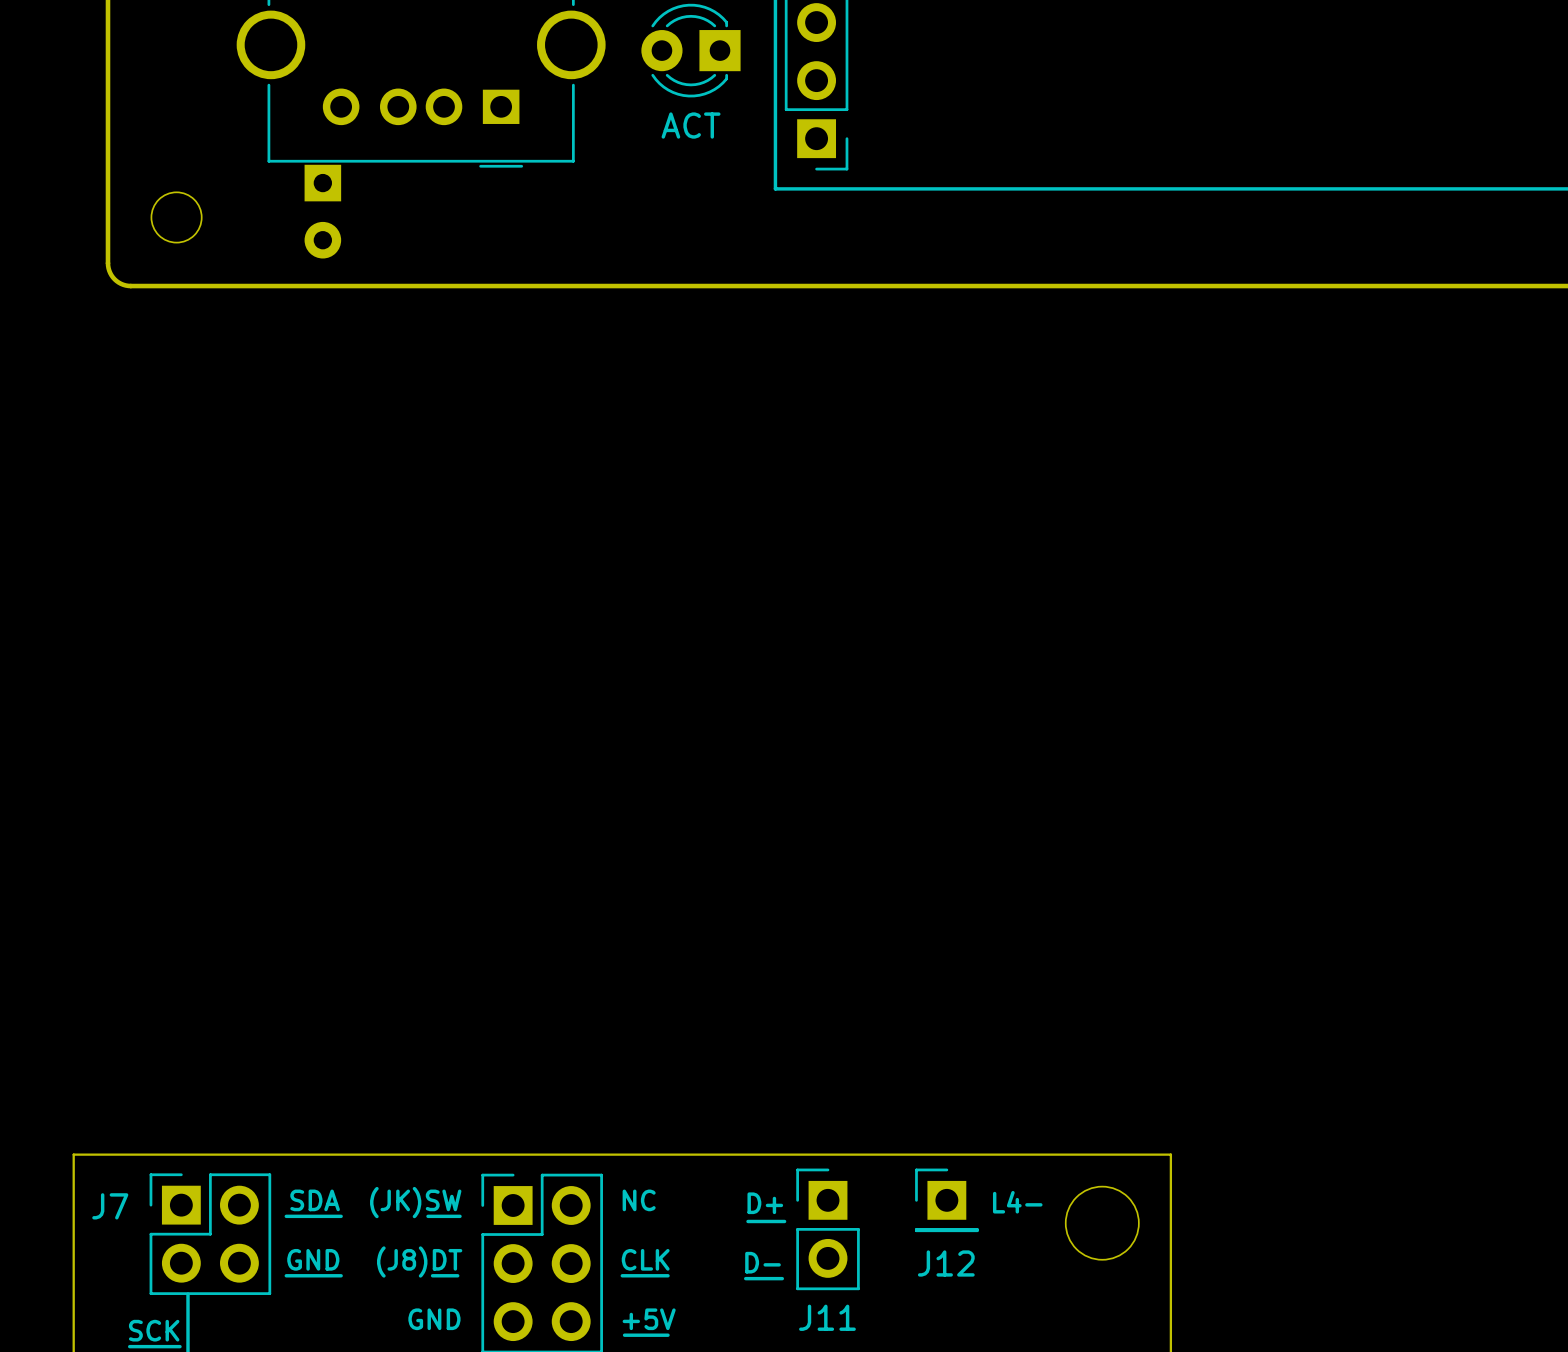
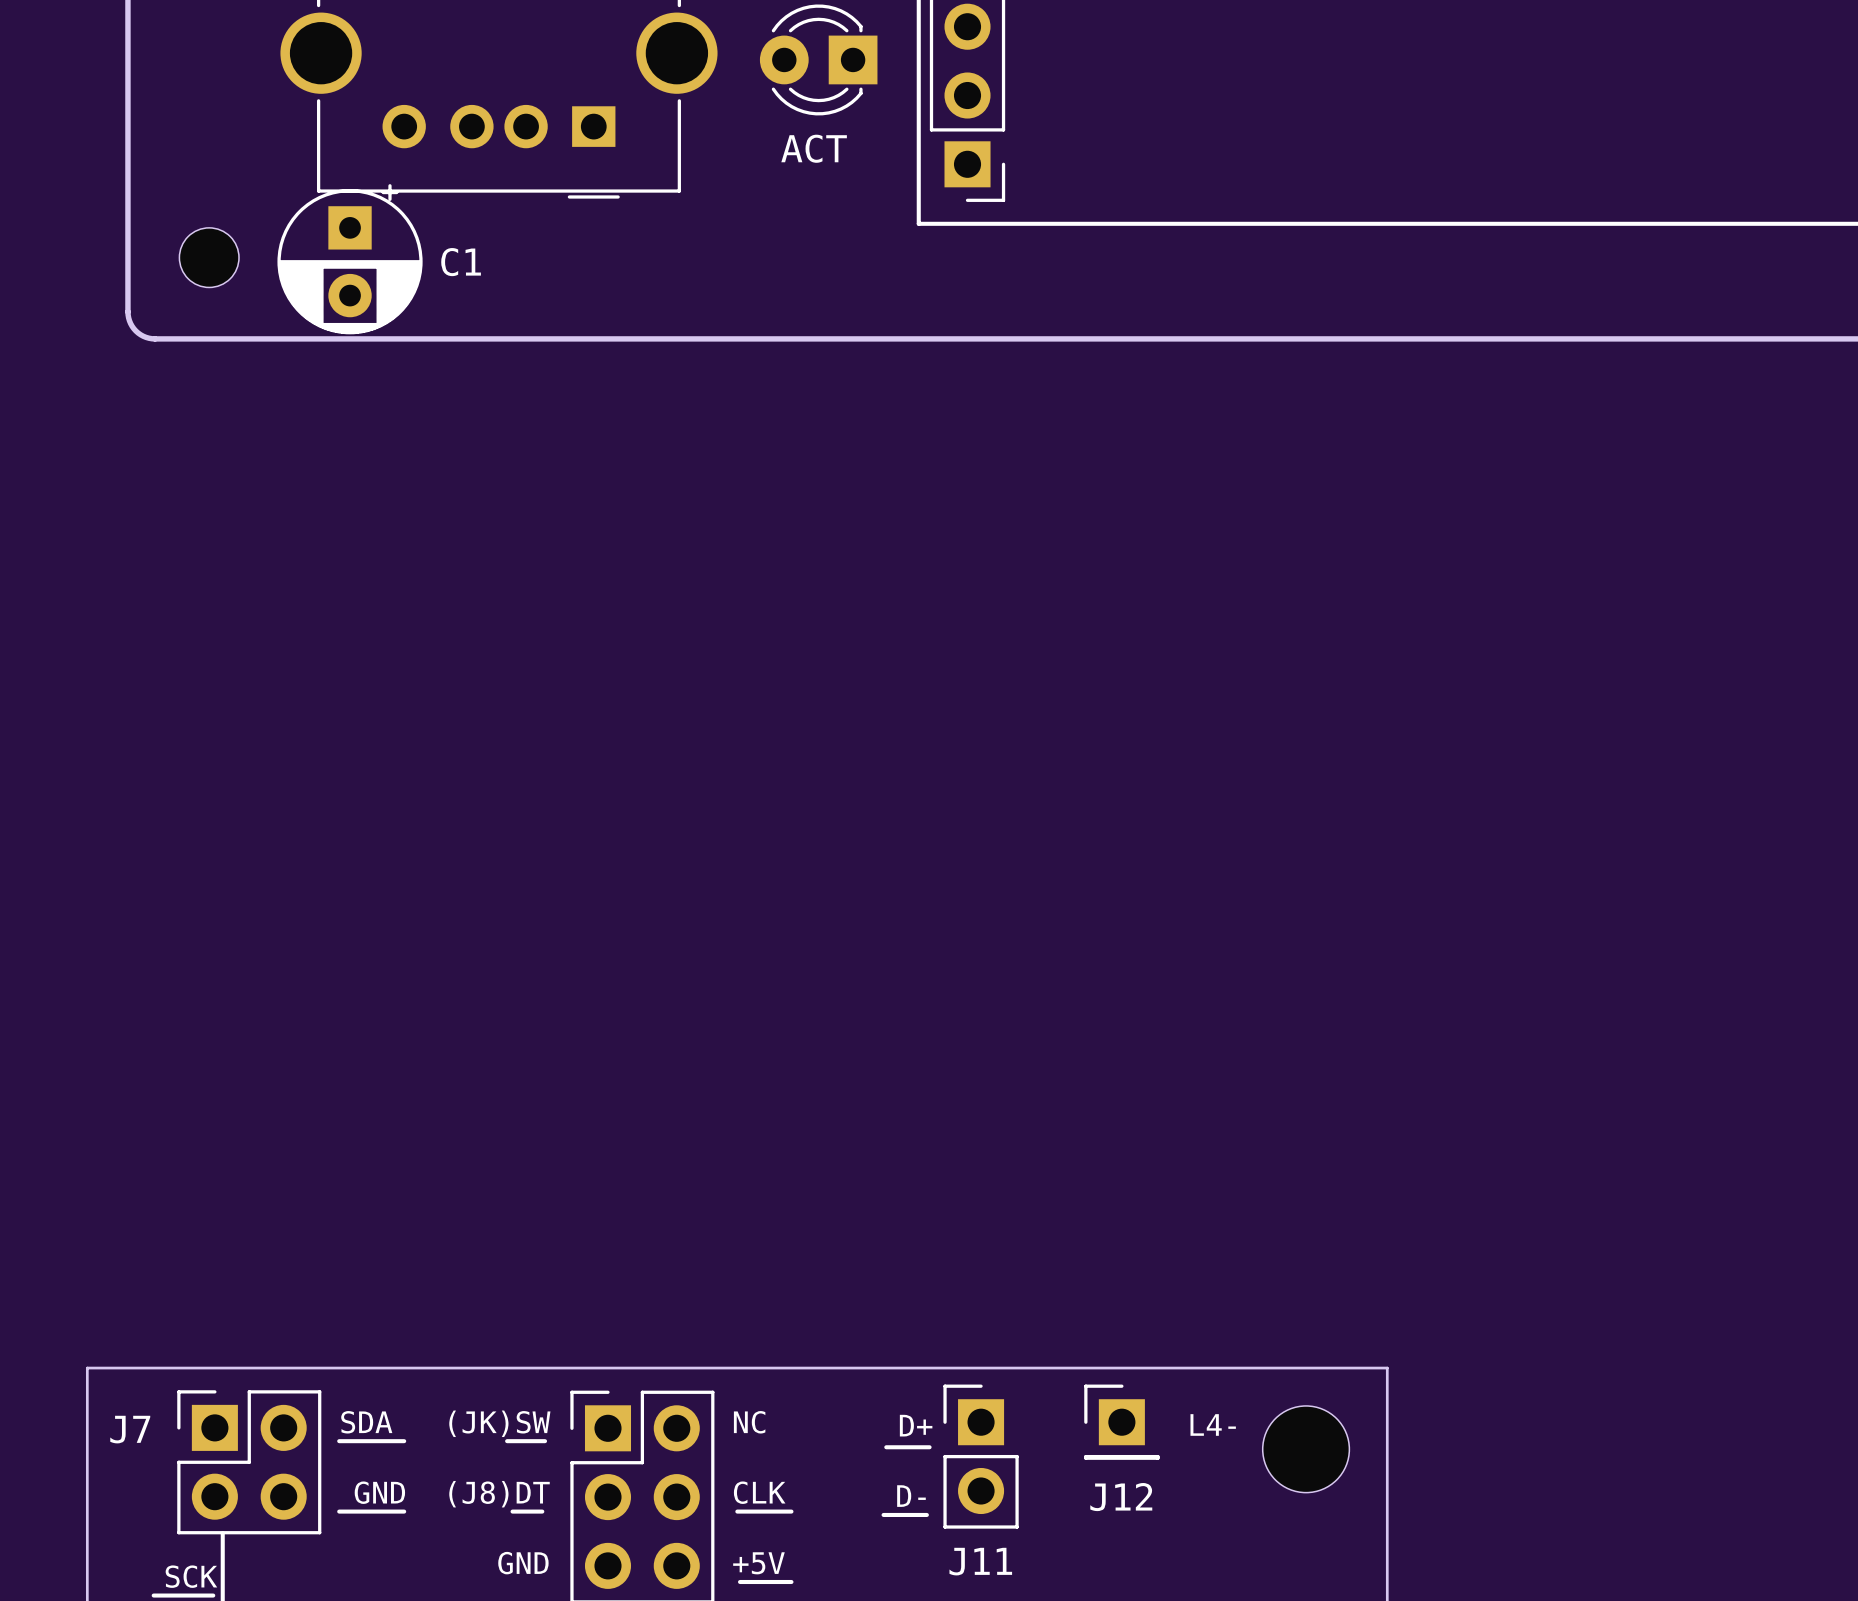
C1 side: bottom (322, 211) -> top (350, 259)

